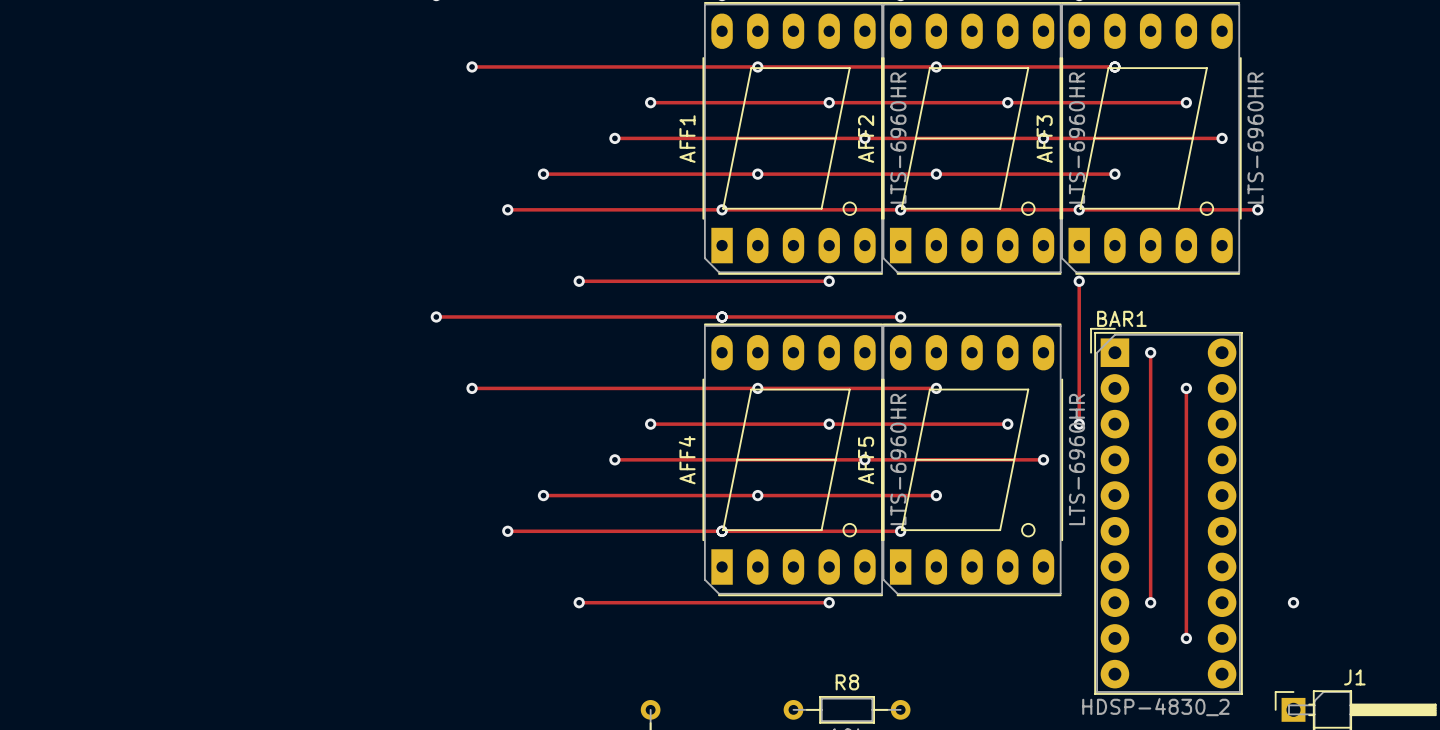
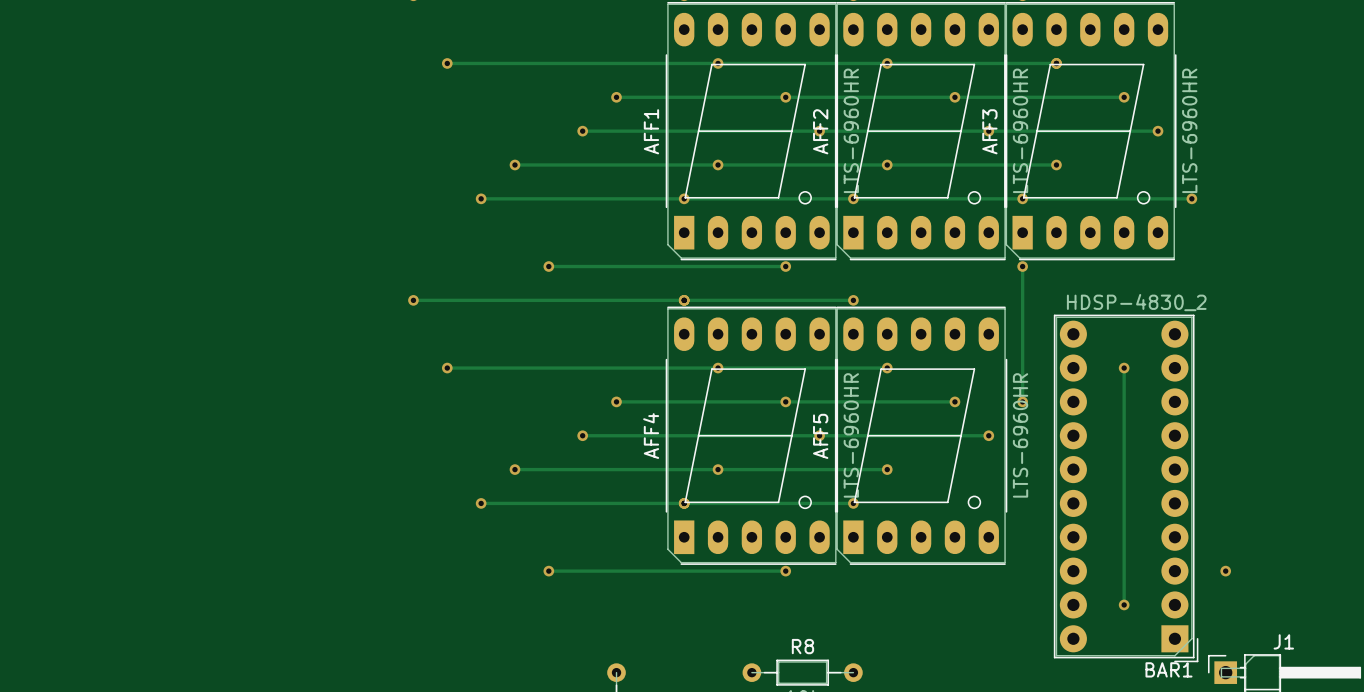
track: (1150, 352) (1150, 602) -> none
via: (1150, 352) -> none
BAR1 rotation: 0° (1166, 511) -> 180° (1126, 488)
via: (1150, 602) -> none

